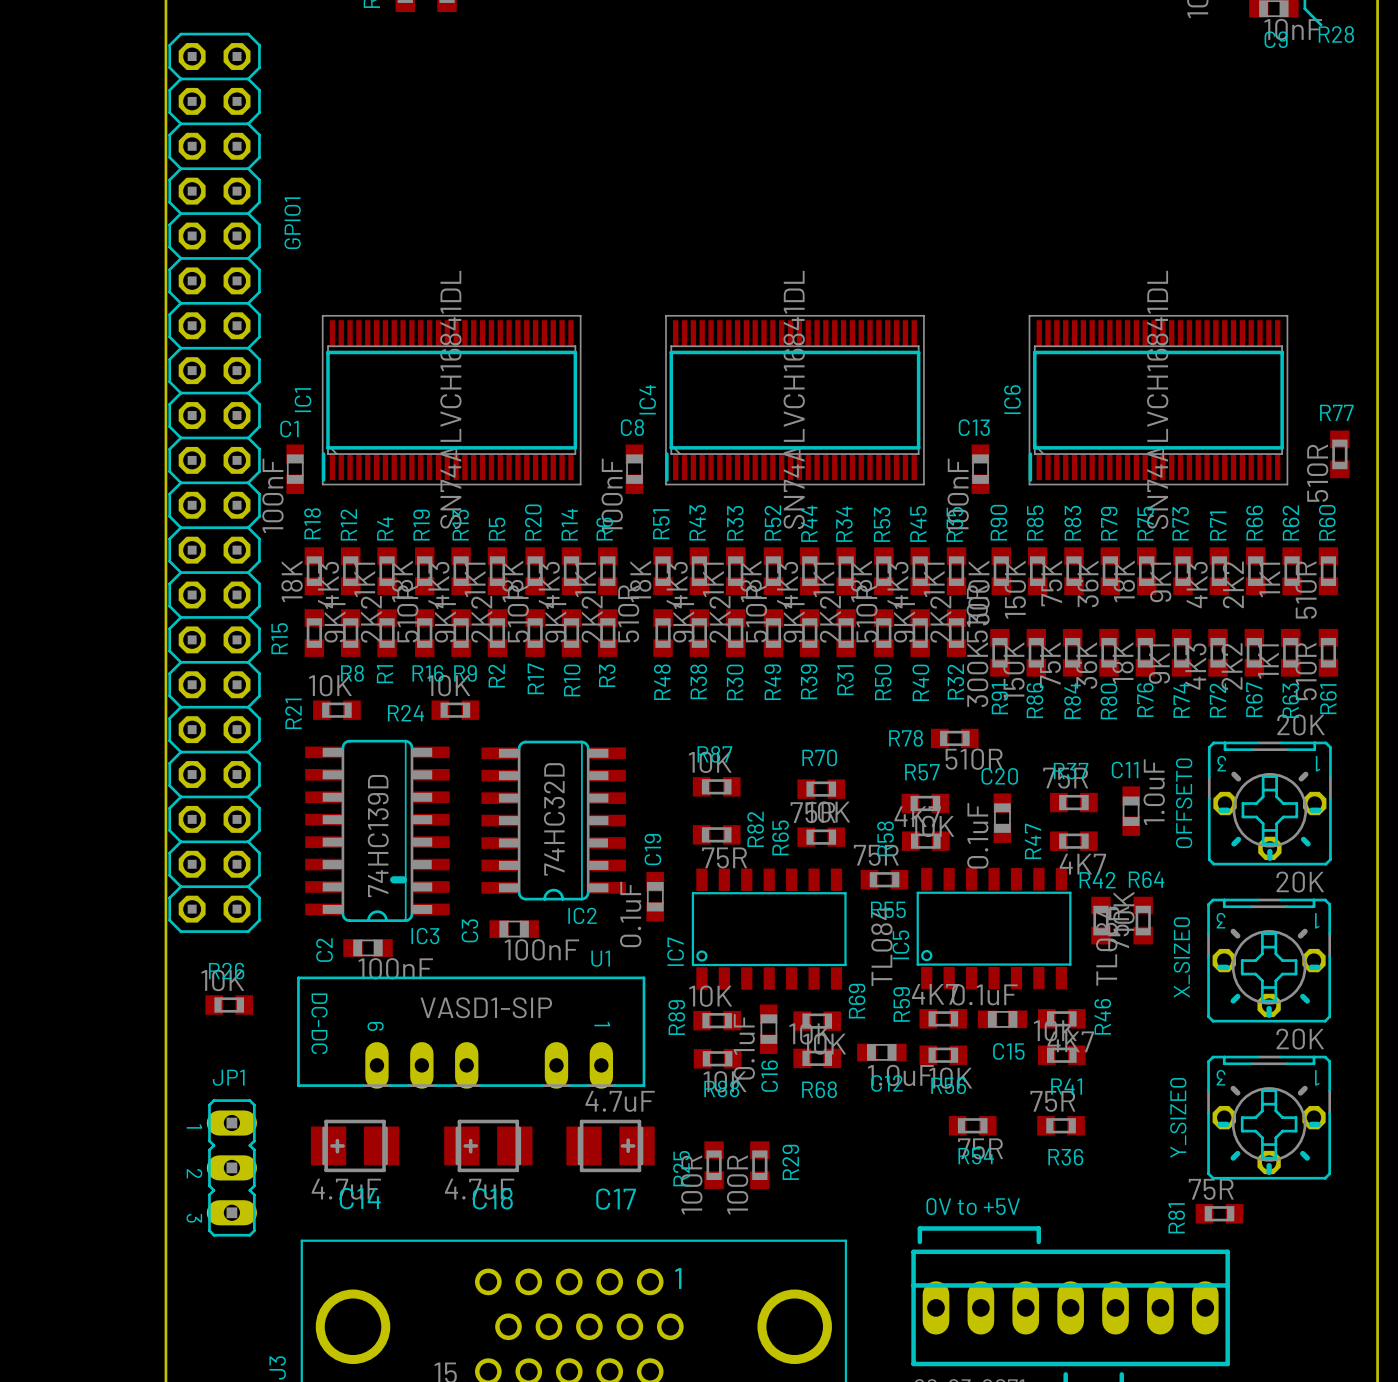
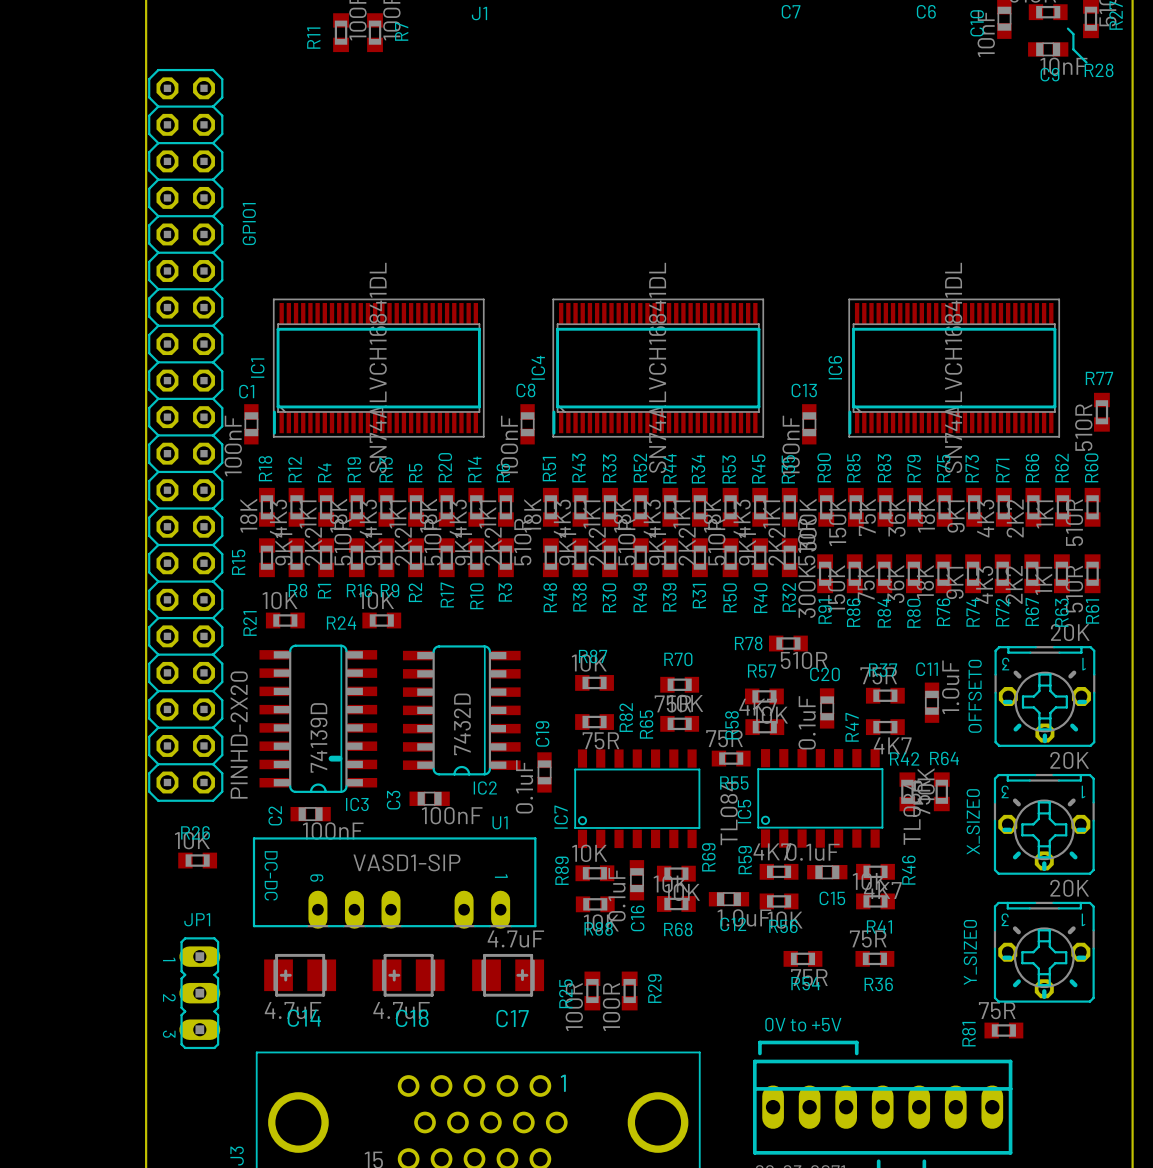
IC2 value: 74HC32D (554, 819) -> 7432D (462, 724)
IC3 value: 74HC139D (378, 836) -> 74139D (318, 737)
GPIO1 value: none -> PINHD-2X20 (239, 735)

